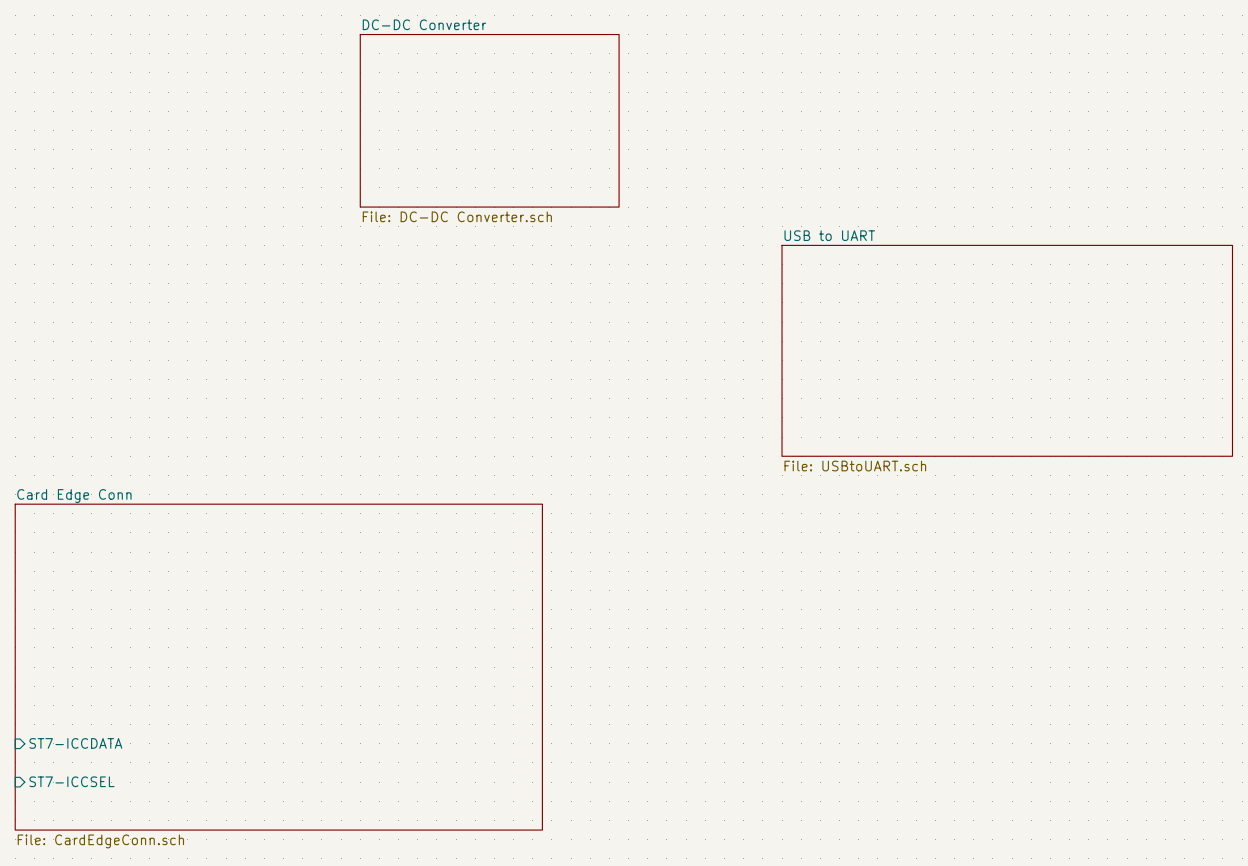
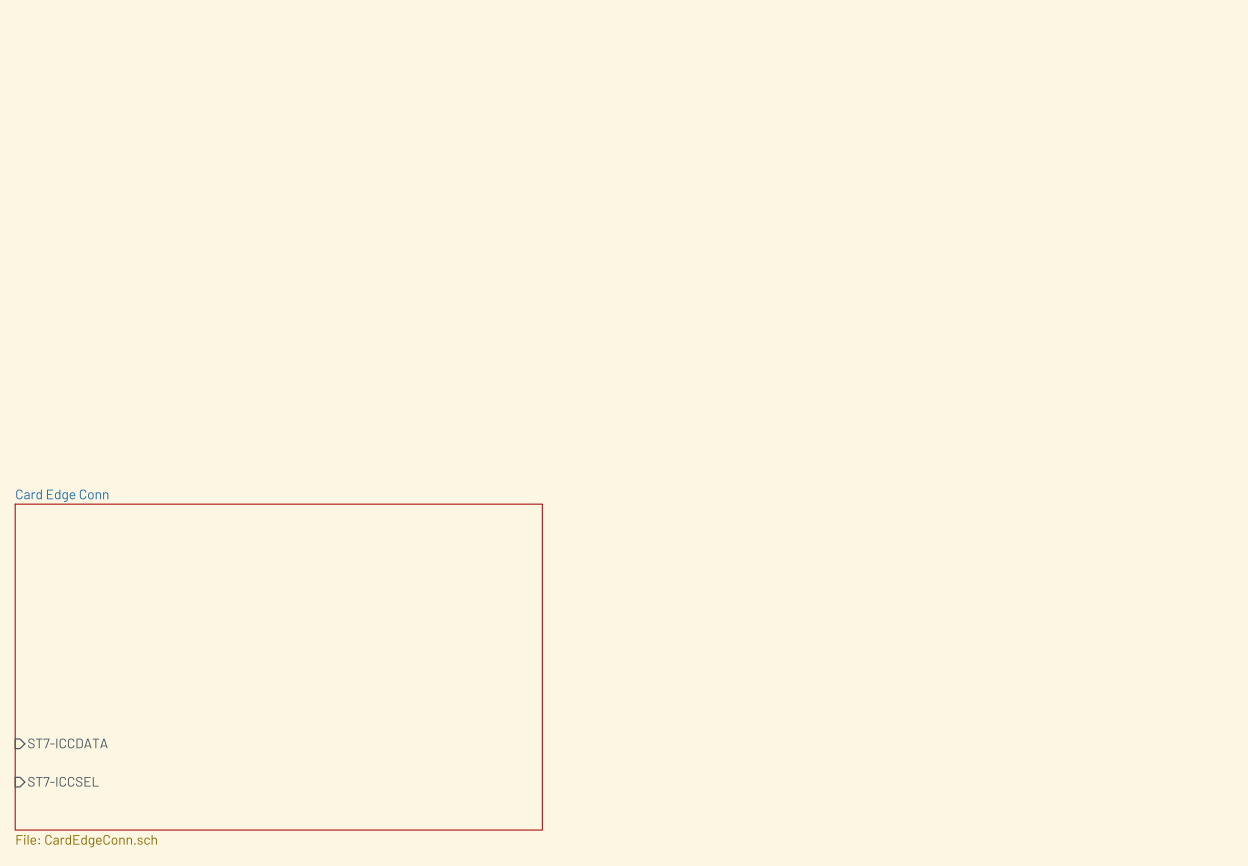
sheet DC-DC Converter: File: DC-DC Converter.sch (489, 120) -> none
sheet USB to UART: File: USBtoUART.sch (1007, 350) -> none

